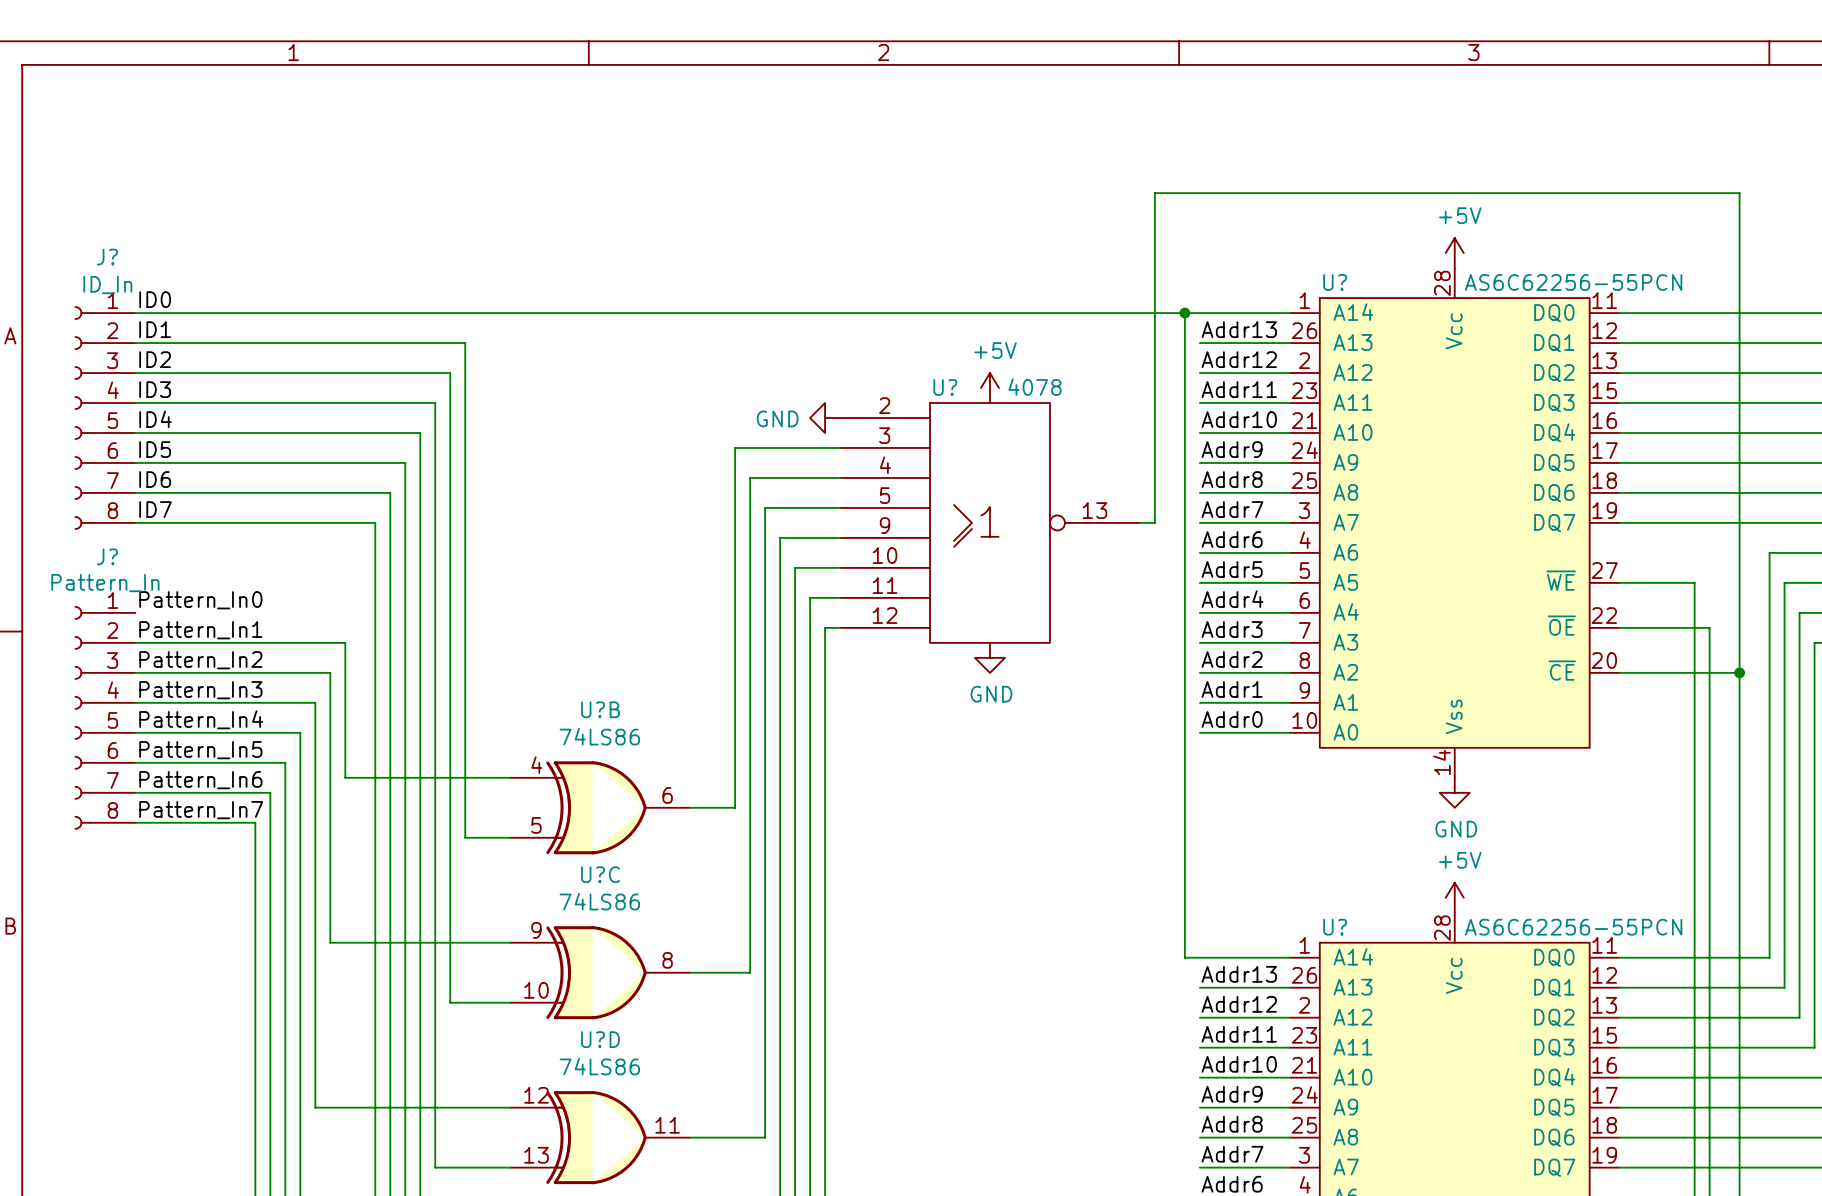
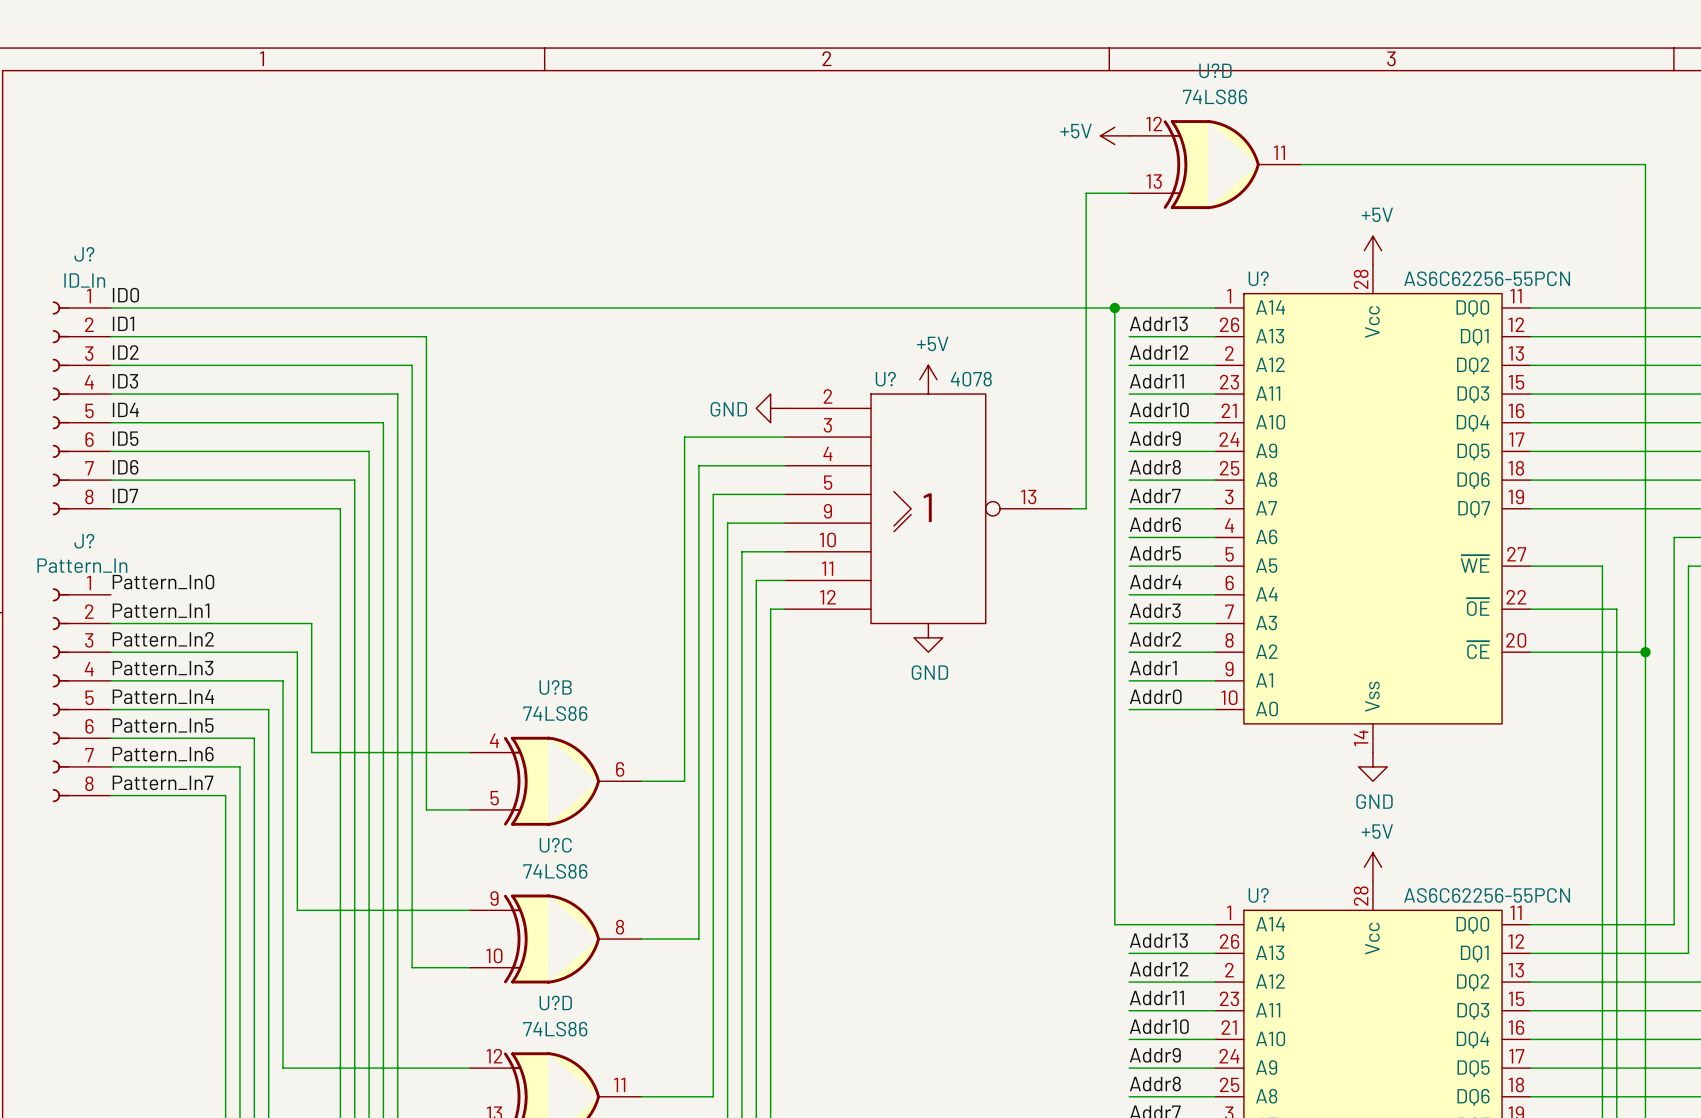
power symbol: none -> +5V (1114, 135)
U?D: none -> 74LS86 (1215, 164)
wire: (1199, 193) (1739, 193) -> (1301, 164) (1645, 164) (1645, 193)

